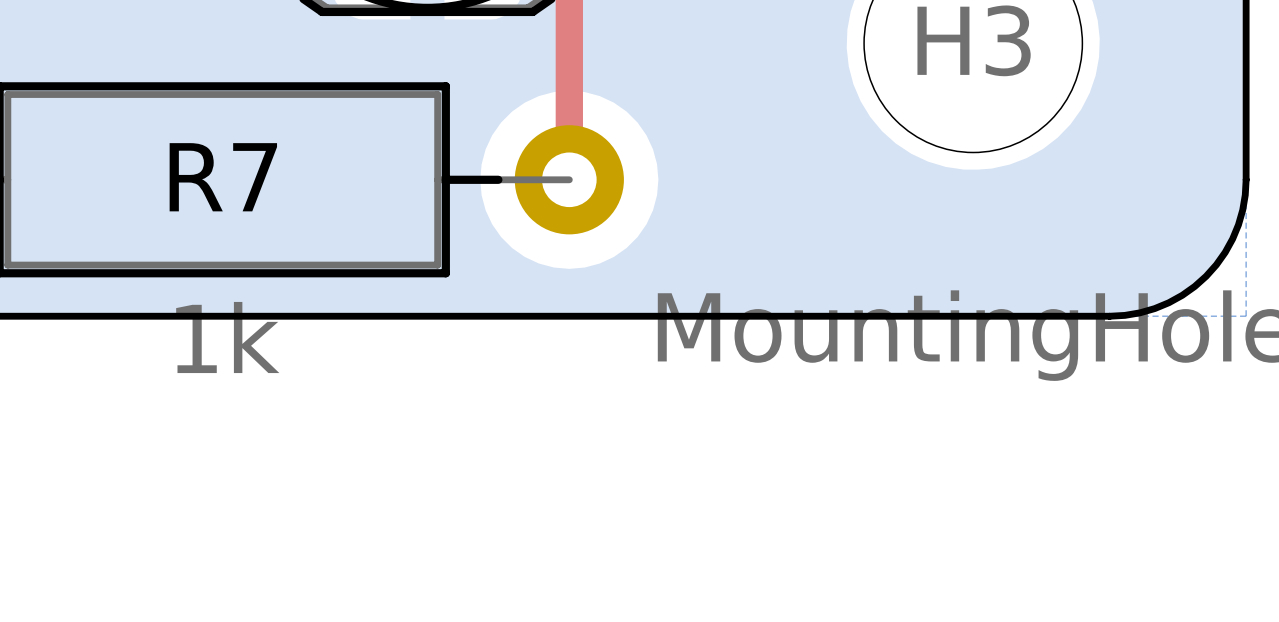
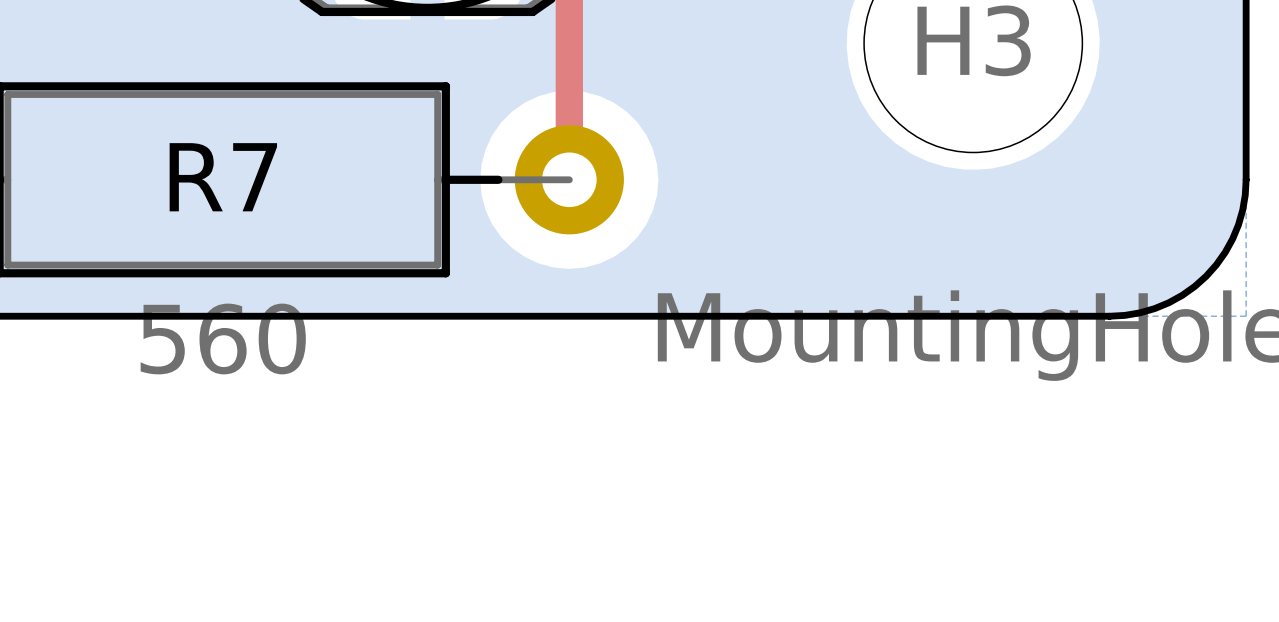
R7 value: 1k (227, 337) -> 560 (223, 338)

